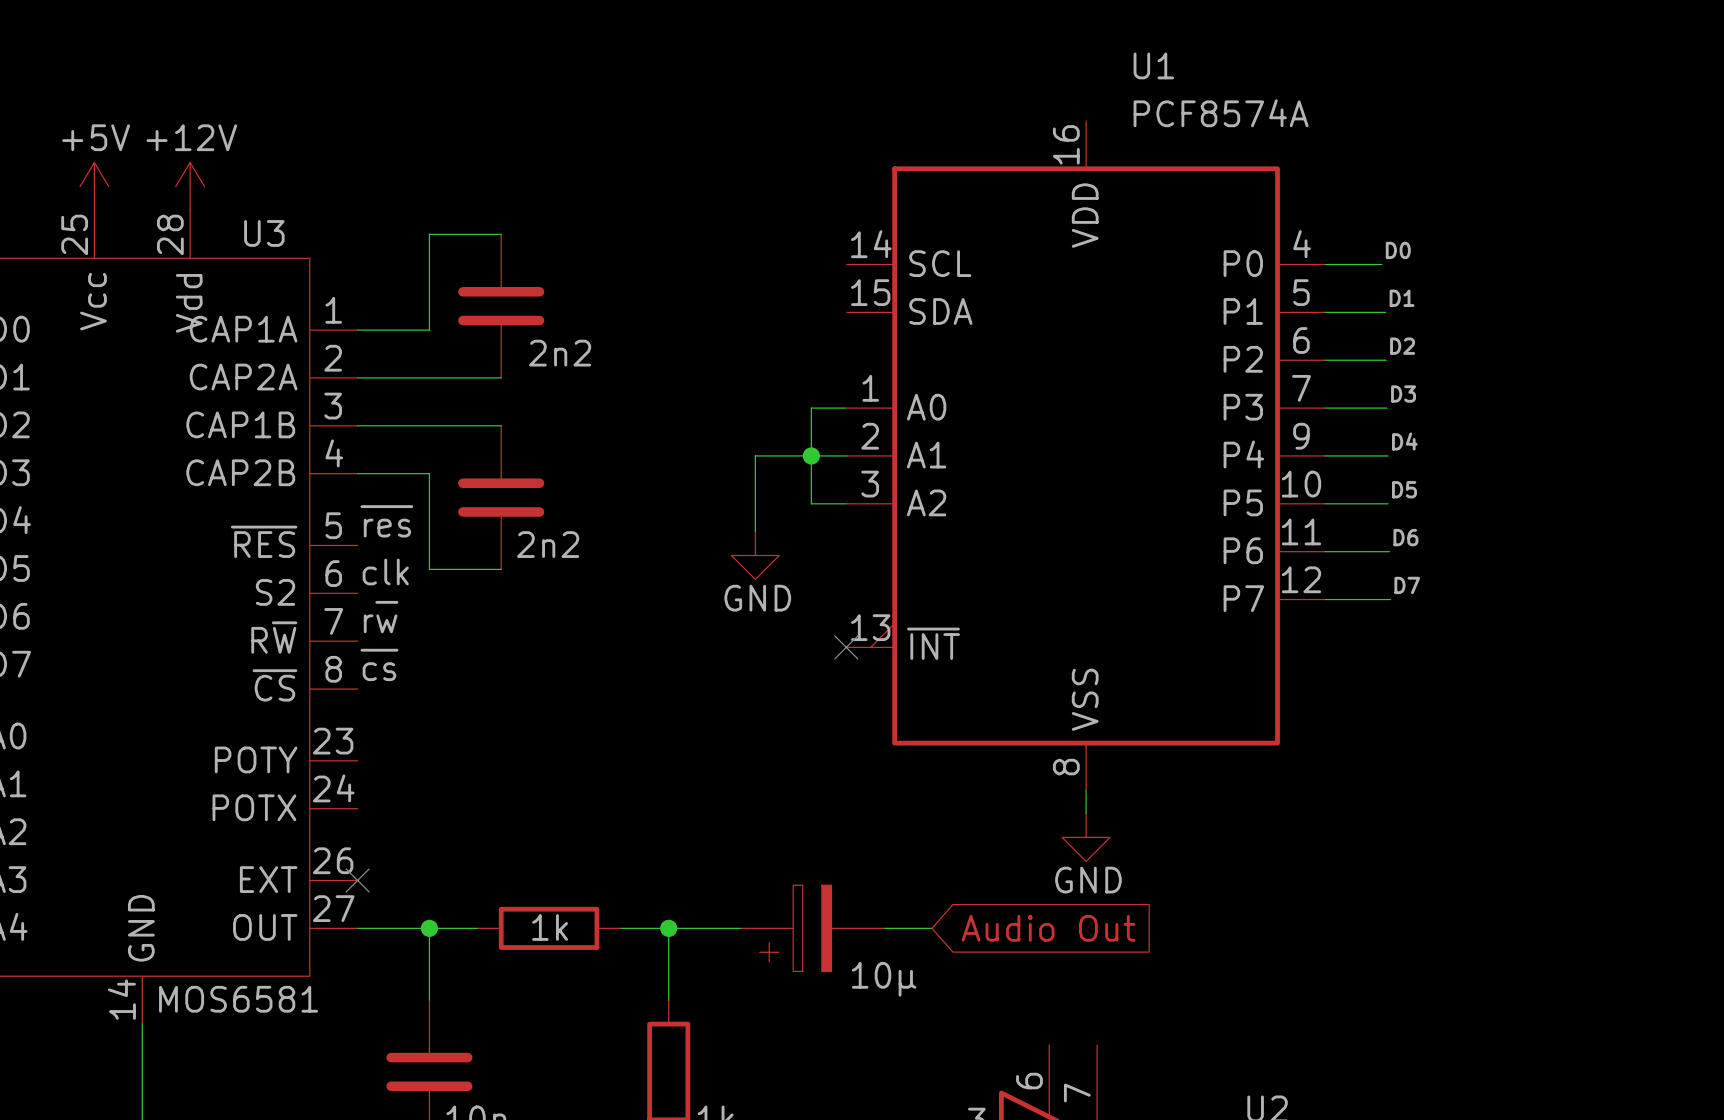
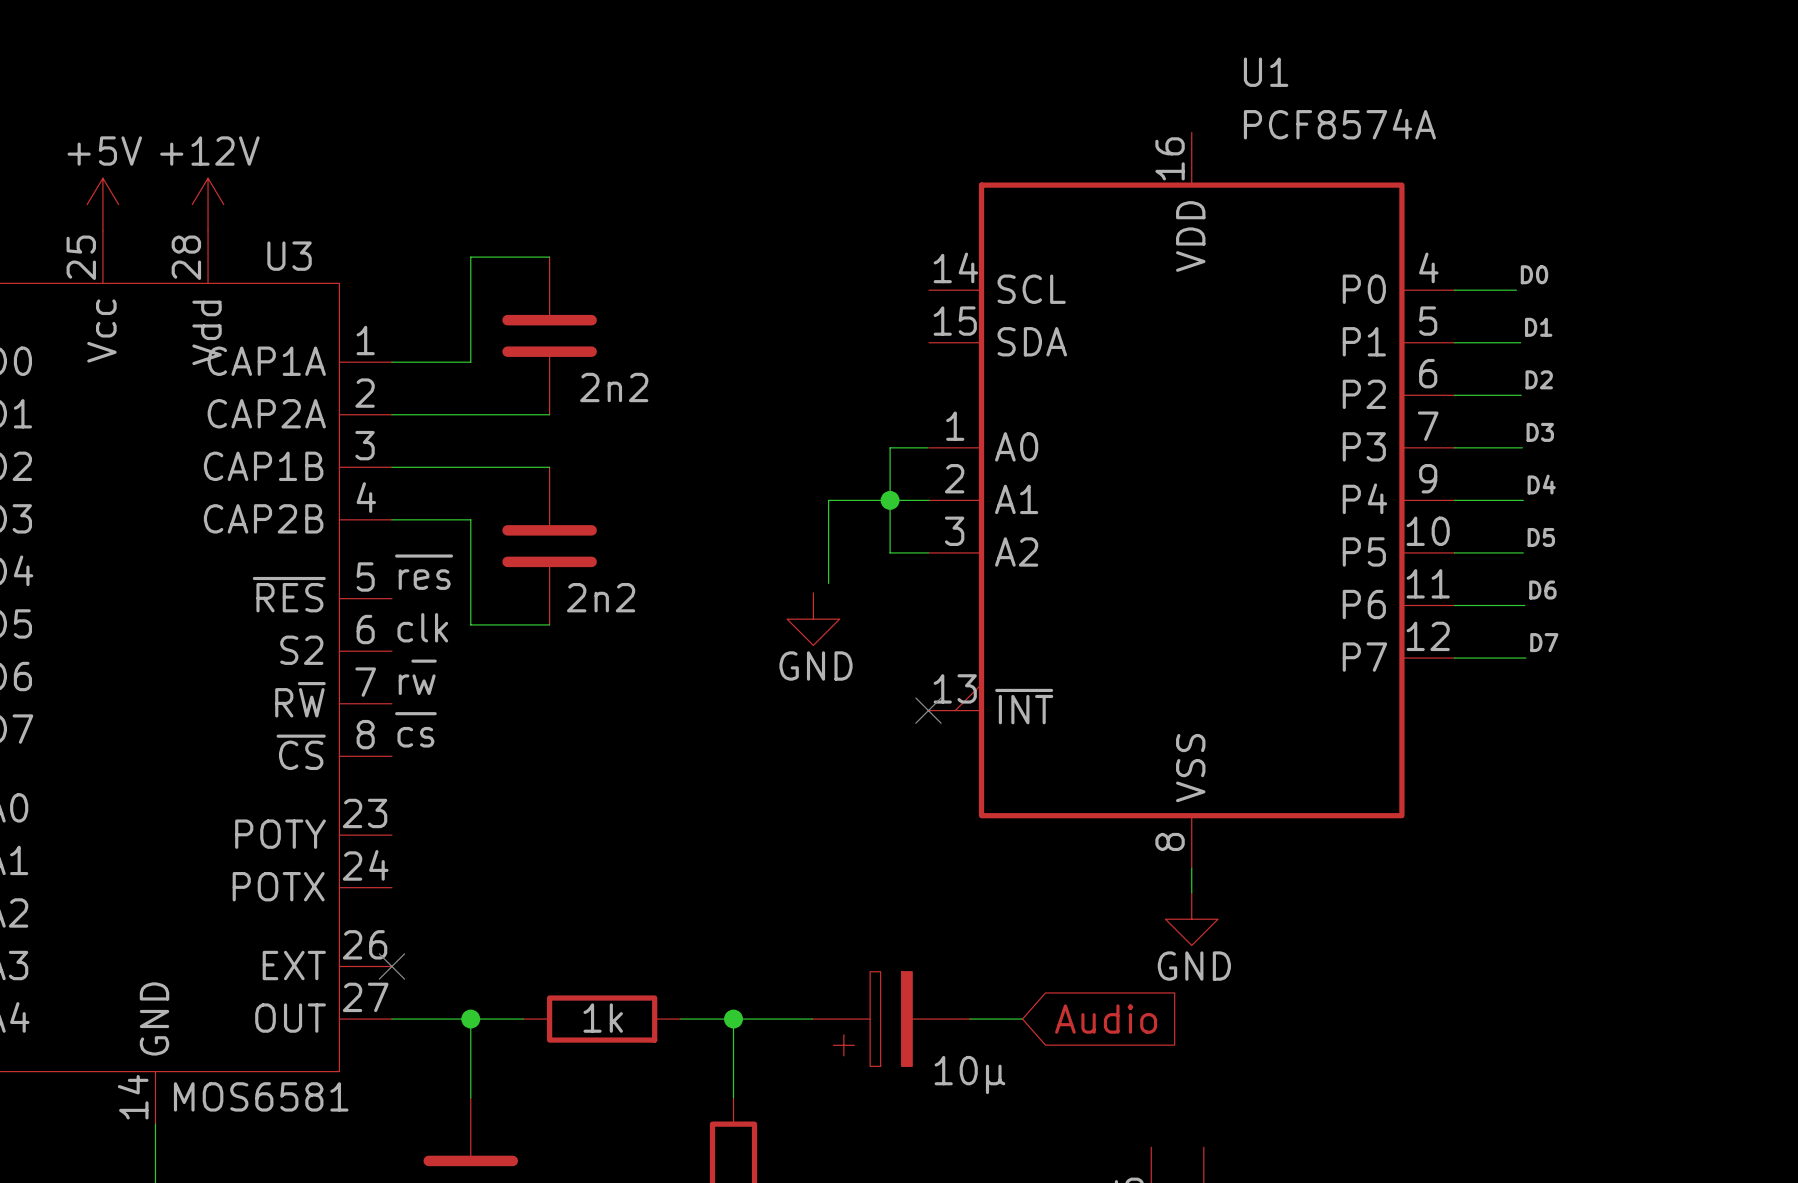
power symbol position: GND (755, 555) -> GND (813, 619)
global label: Audio Out (1048, 928) -> Audio (1106, 1019)

